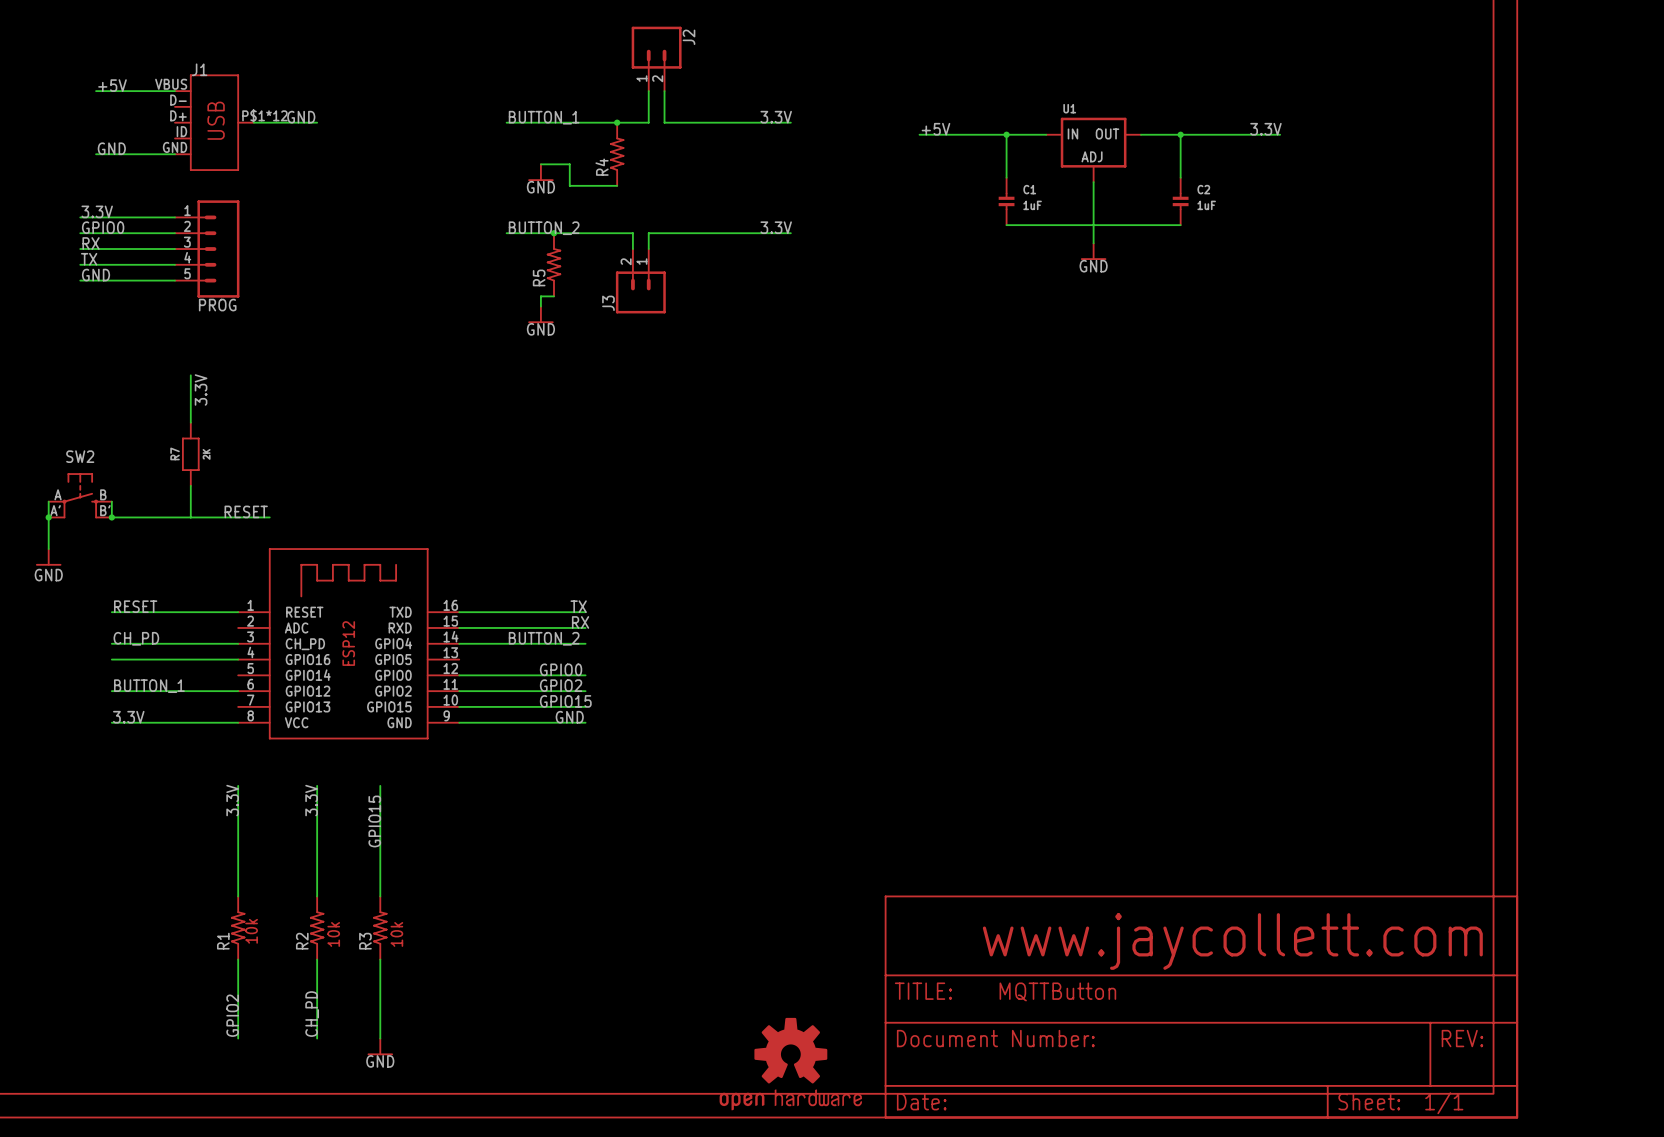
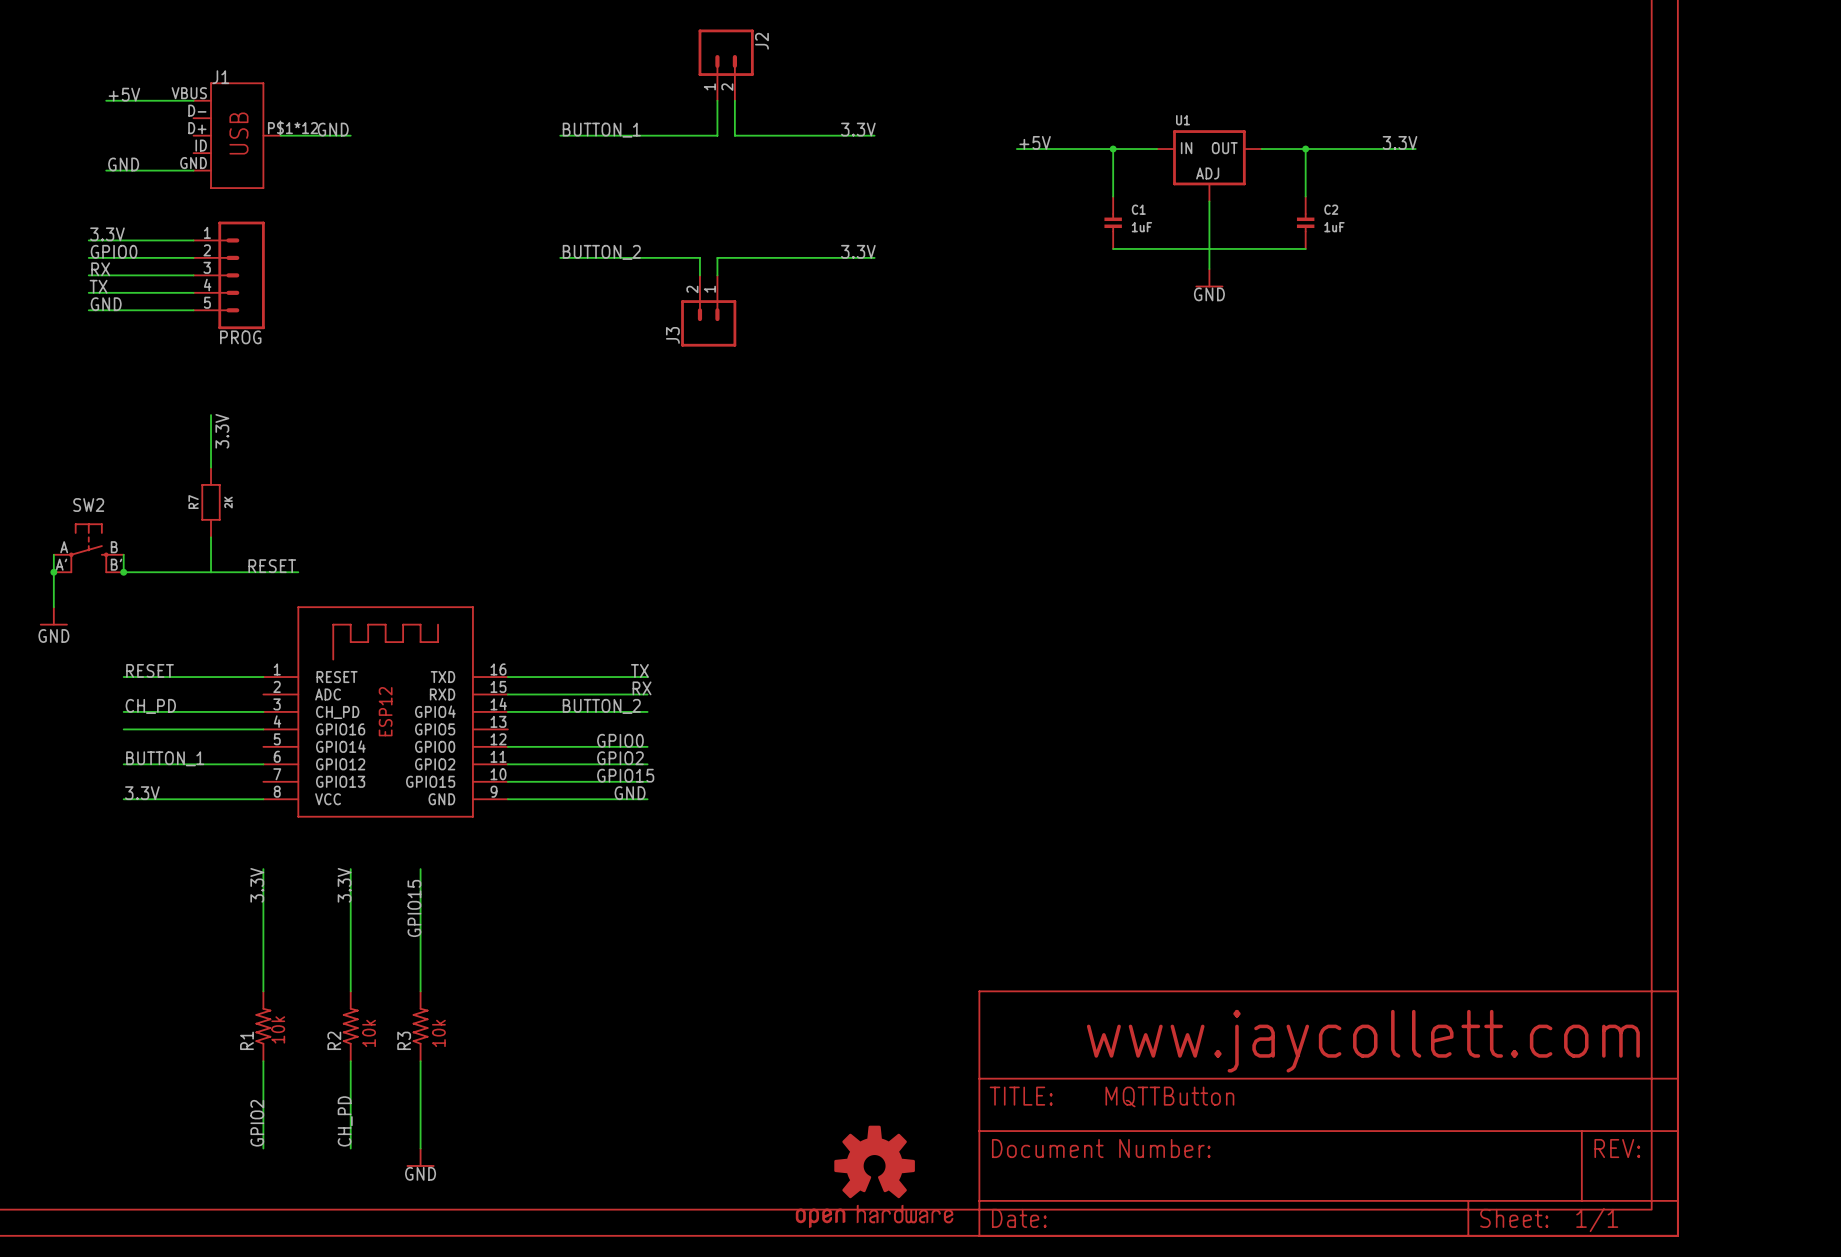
junction: (617, 122) -> none
R4: (617, 154) -> none
wire: (540, 164) (569, 164) (569, 185) (617, 185) -> none
power symbol: GND (540, 172) -> none
junction: (553, 233) -> none
R5: (553, 264) -> none
wire: (553, 296) (540, 296) (540, 306) -> none
power symbol: GND (540, 314) -> none

